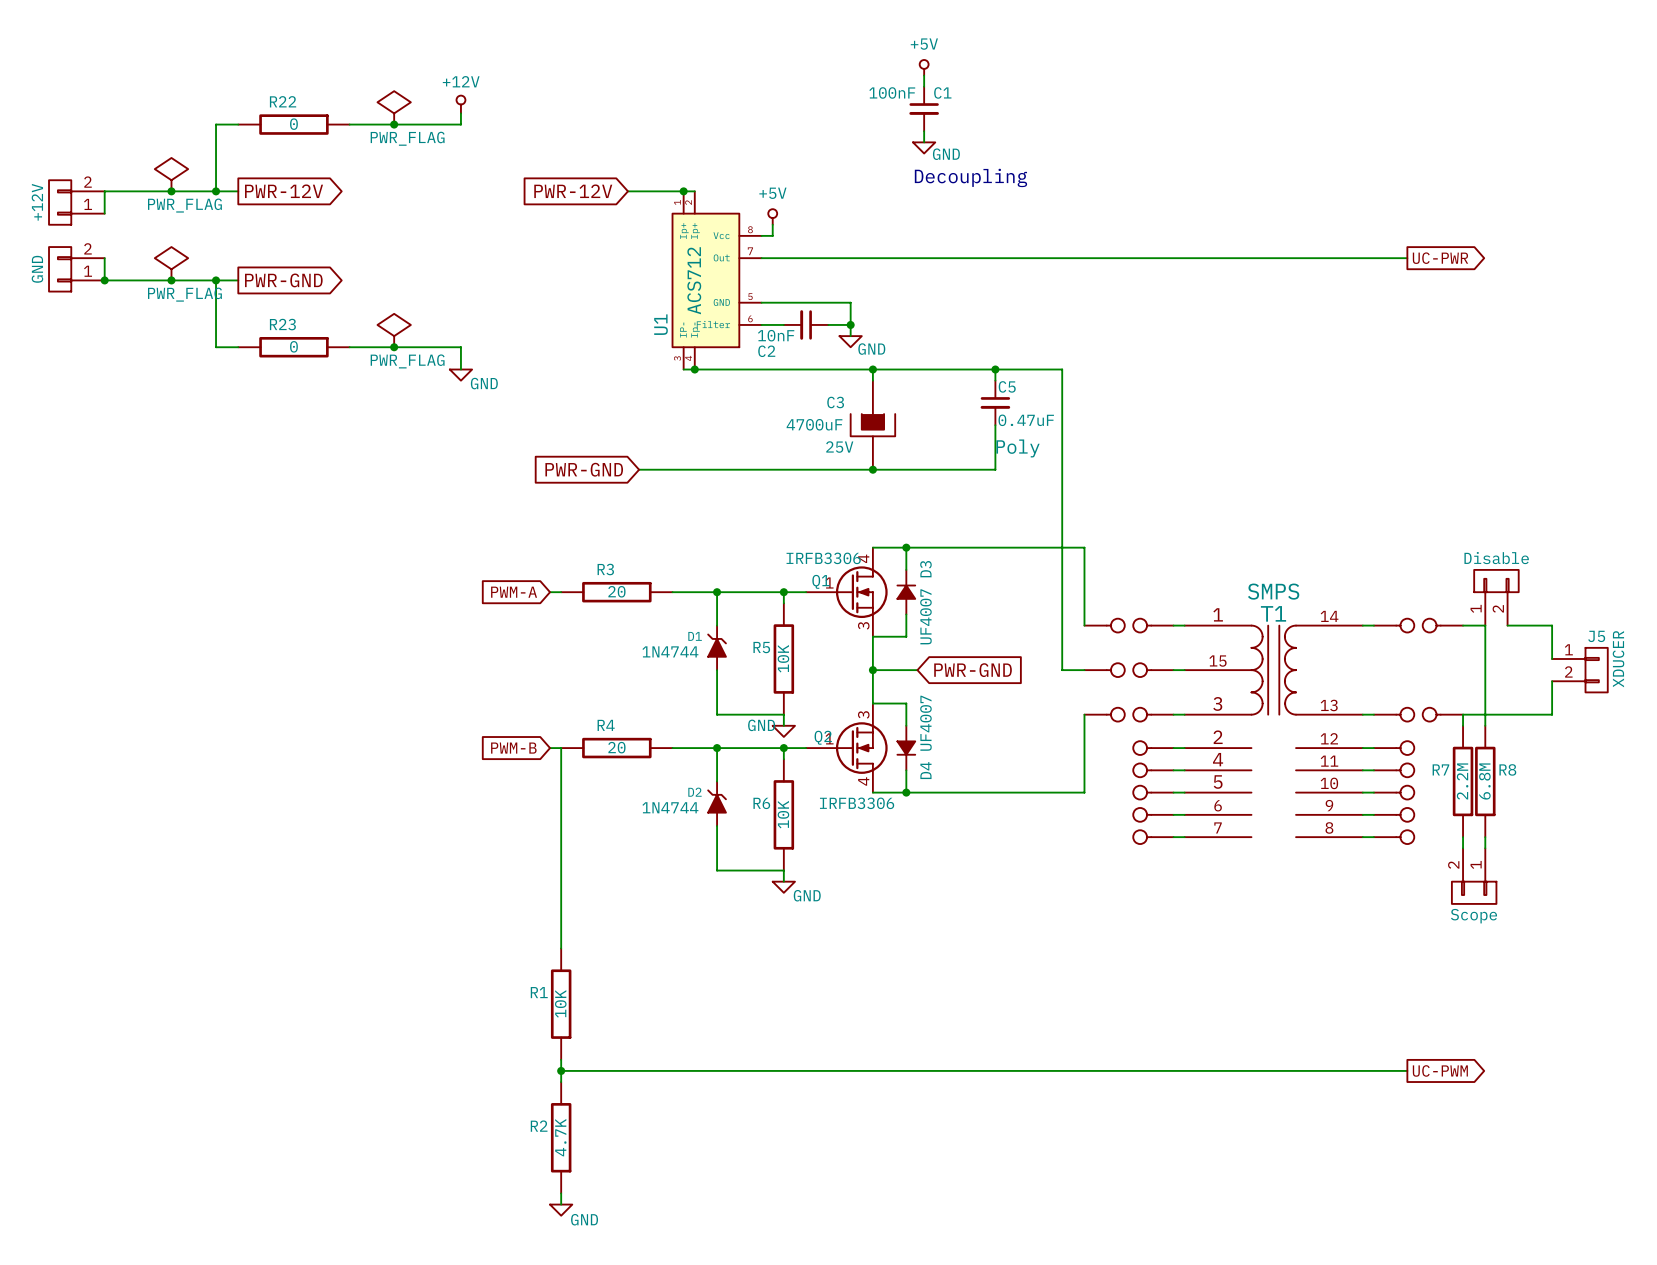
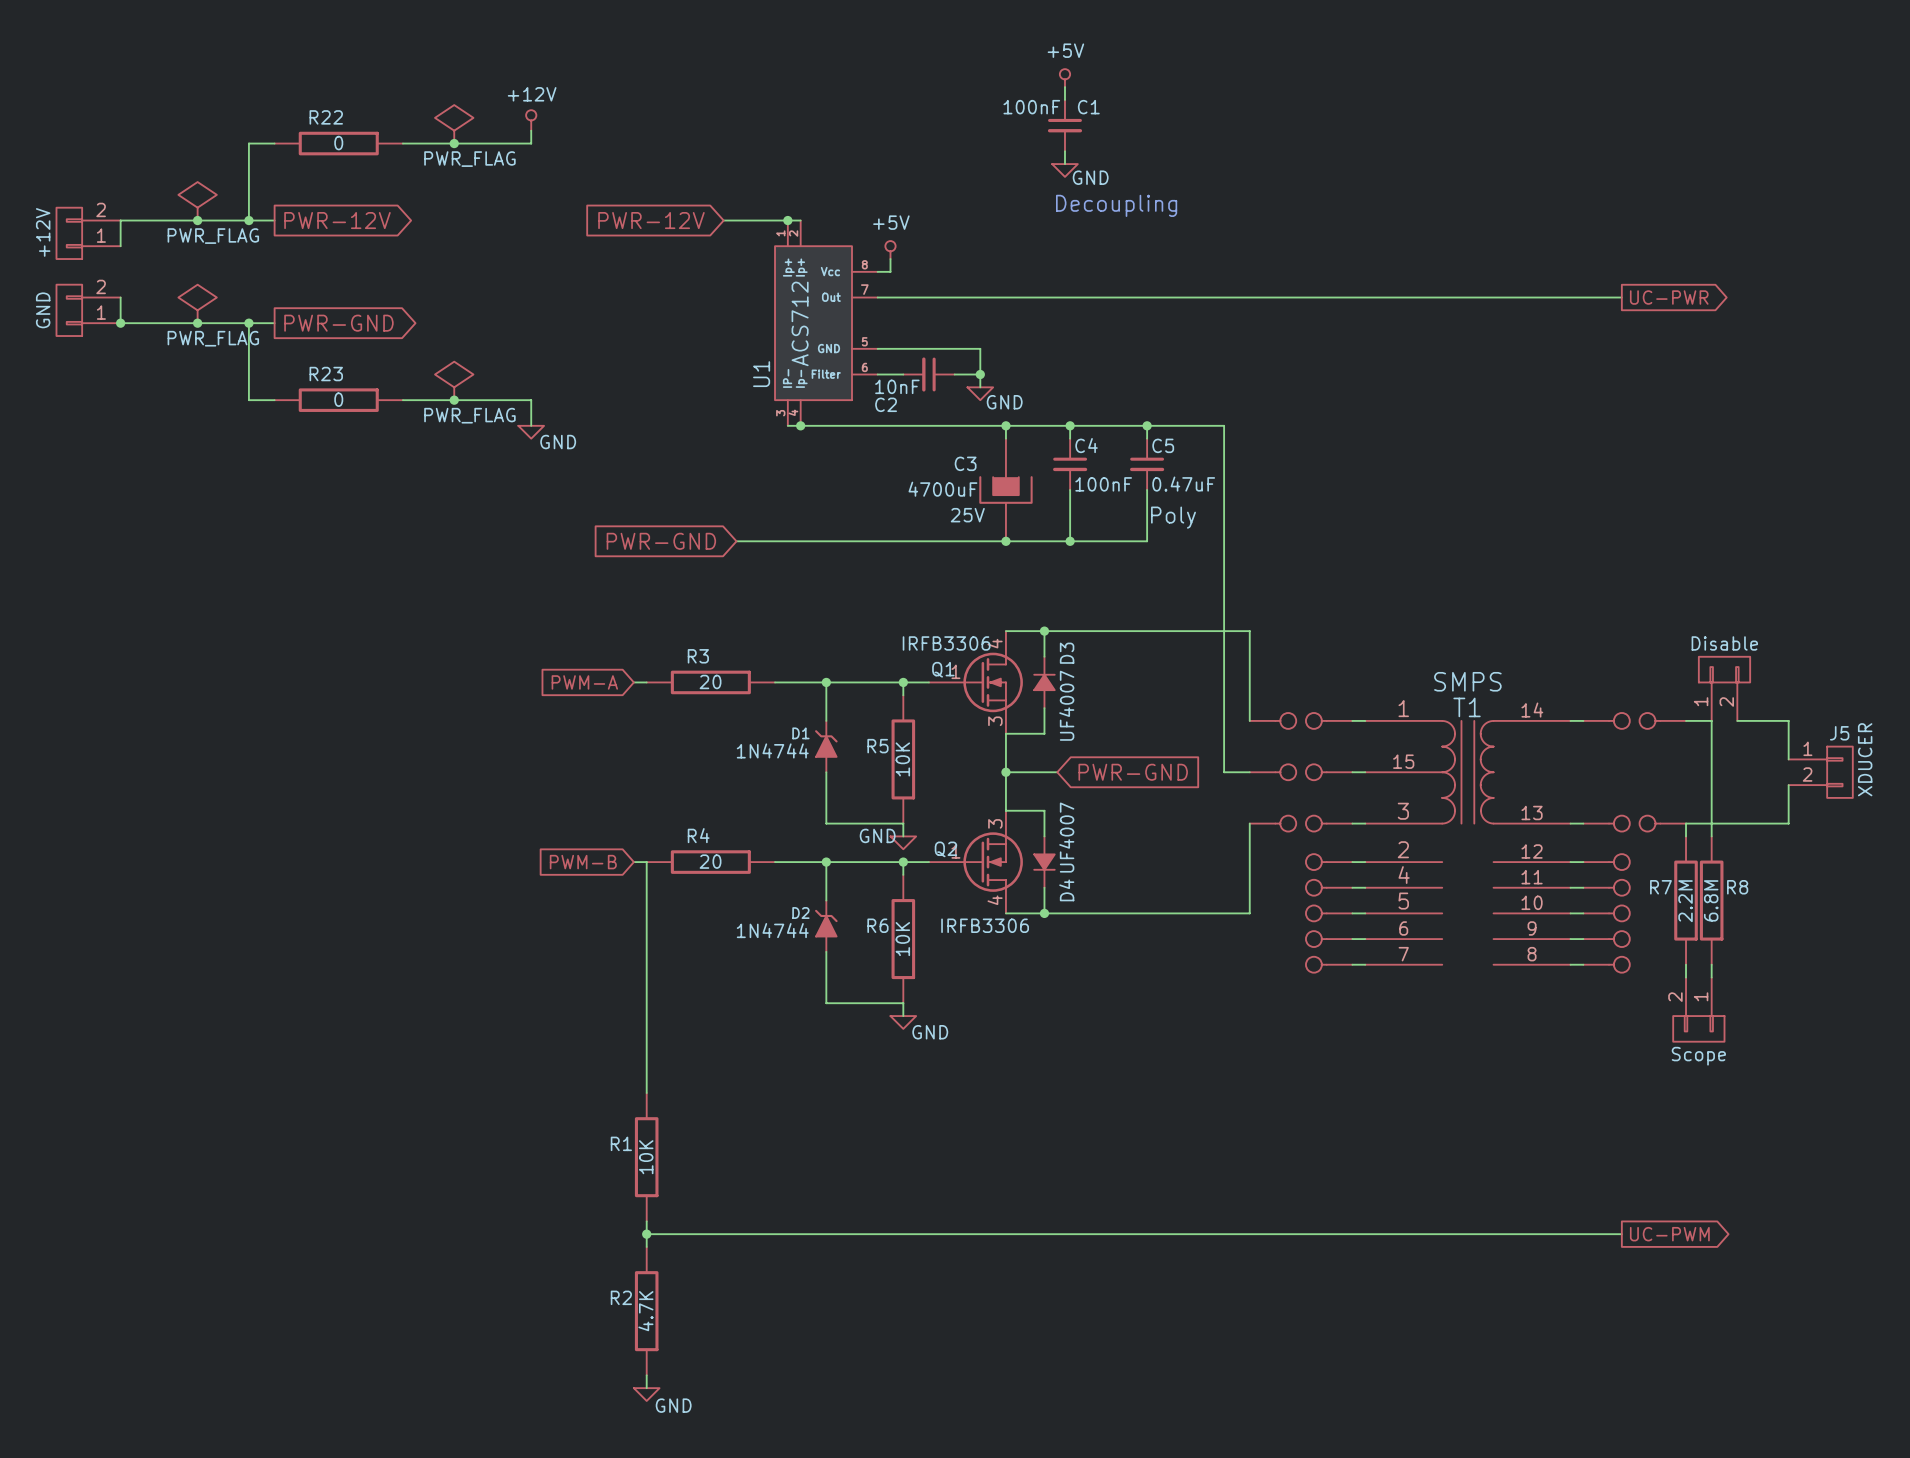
wire: none -> (1070, 425) (1070, 438)
junction: none -> (1070, 425)
C4: none -> 100nF (1070, 464)
wire: none -> (1070, 489) (1070, 541)
junction: none -> (1070, 541)

